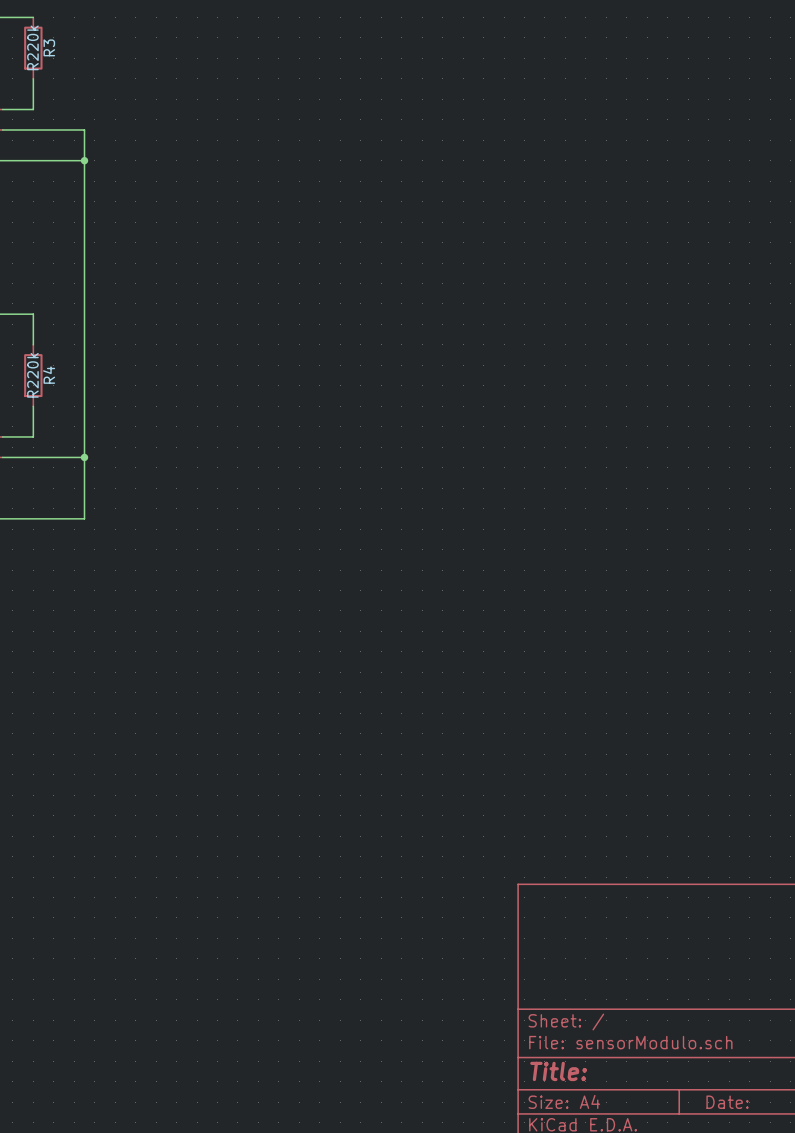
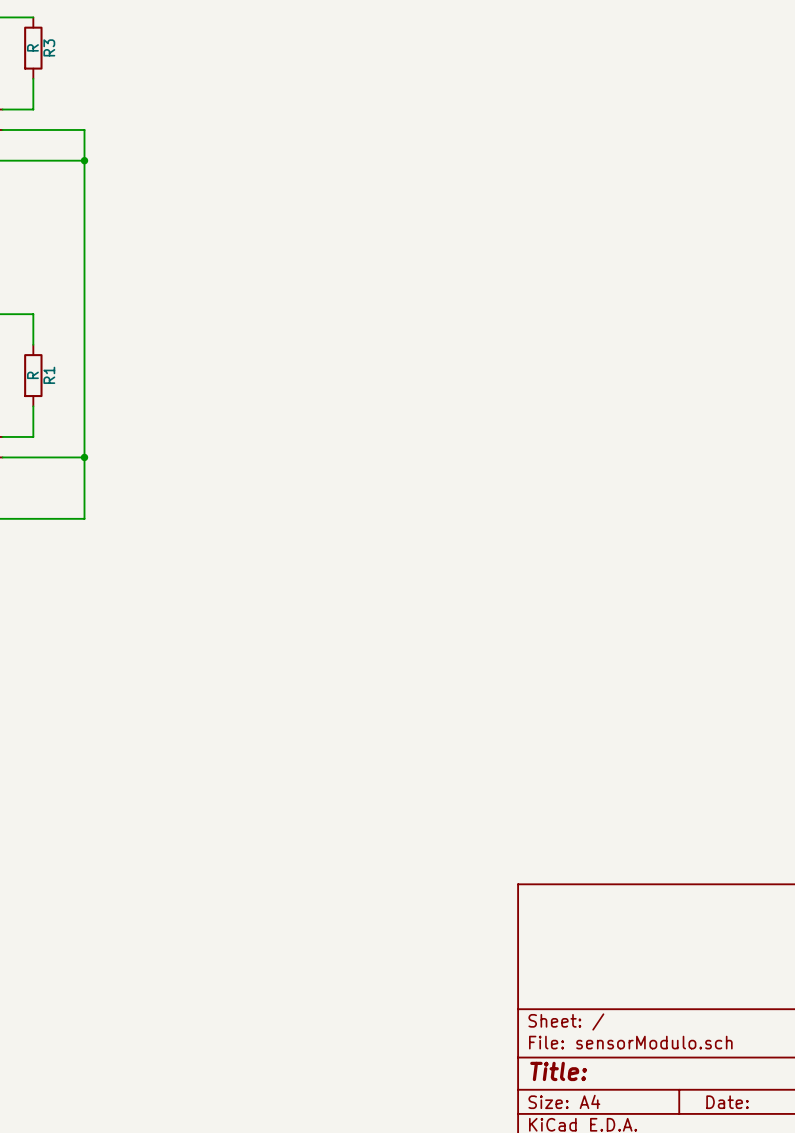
R3 value: R220k (32, 47) -> R (32, 47)
R4 value: R220k (32, 375) -> R (32, 375)
R4 name: R4 (49, 375) -> R1 (49, 375)

